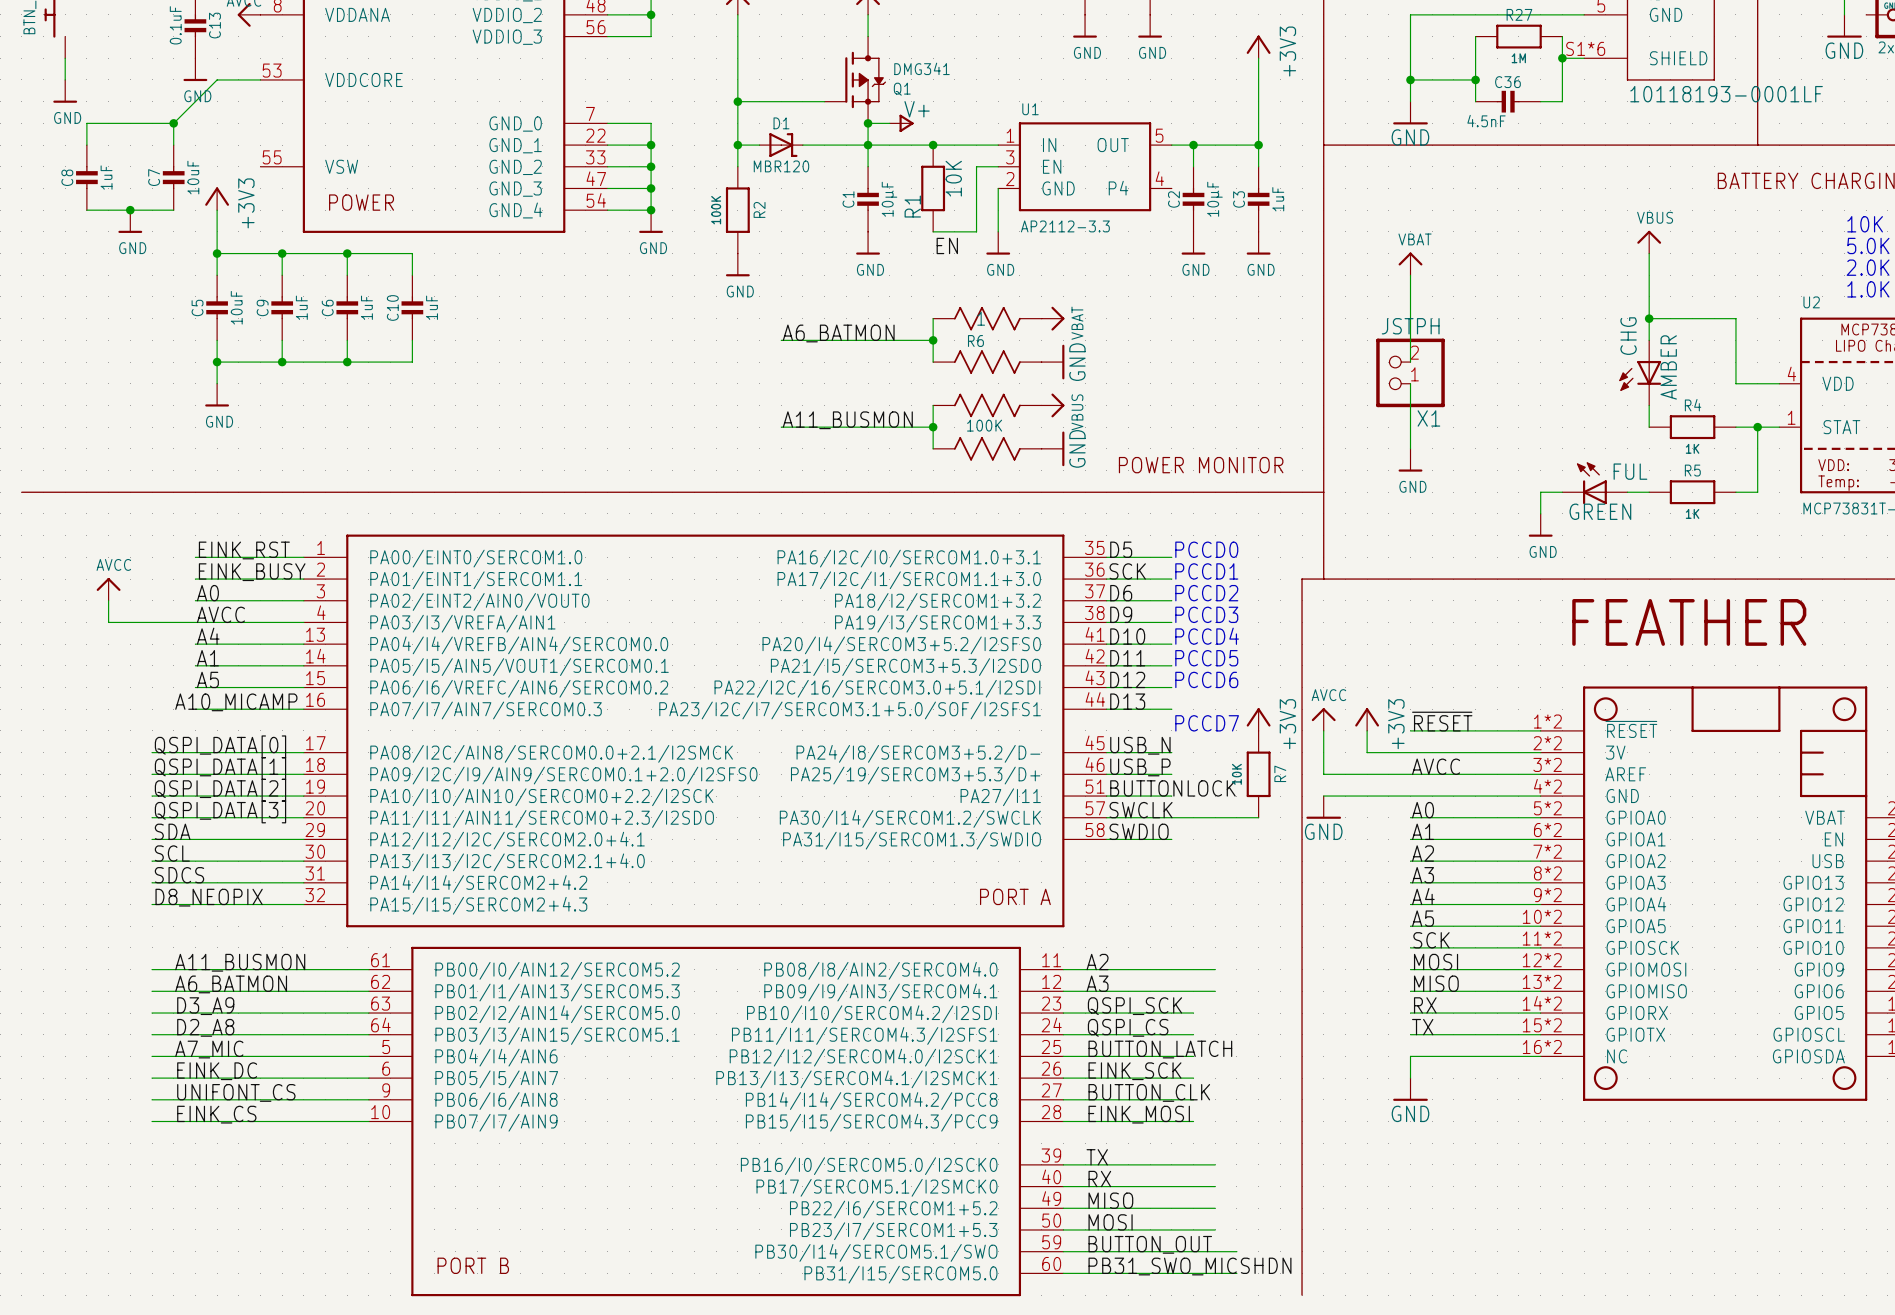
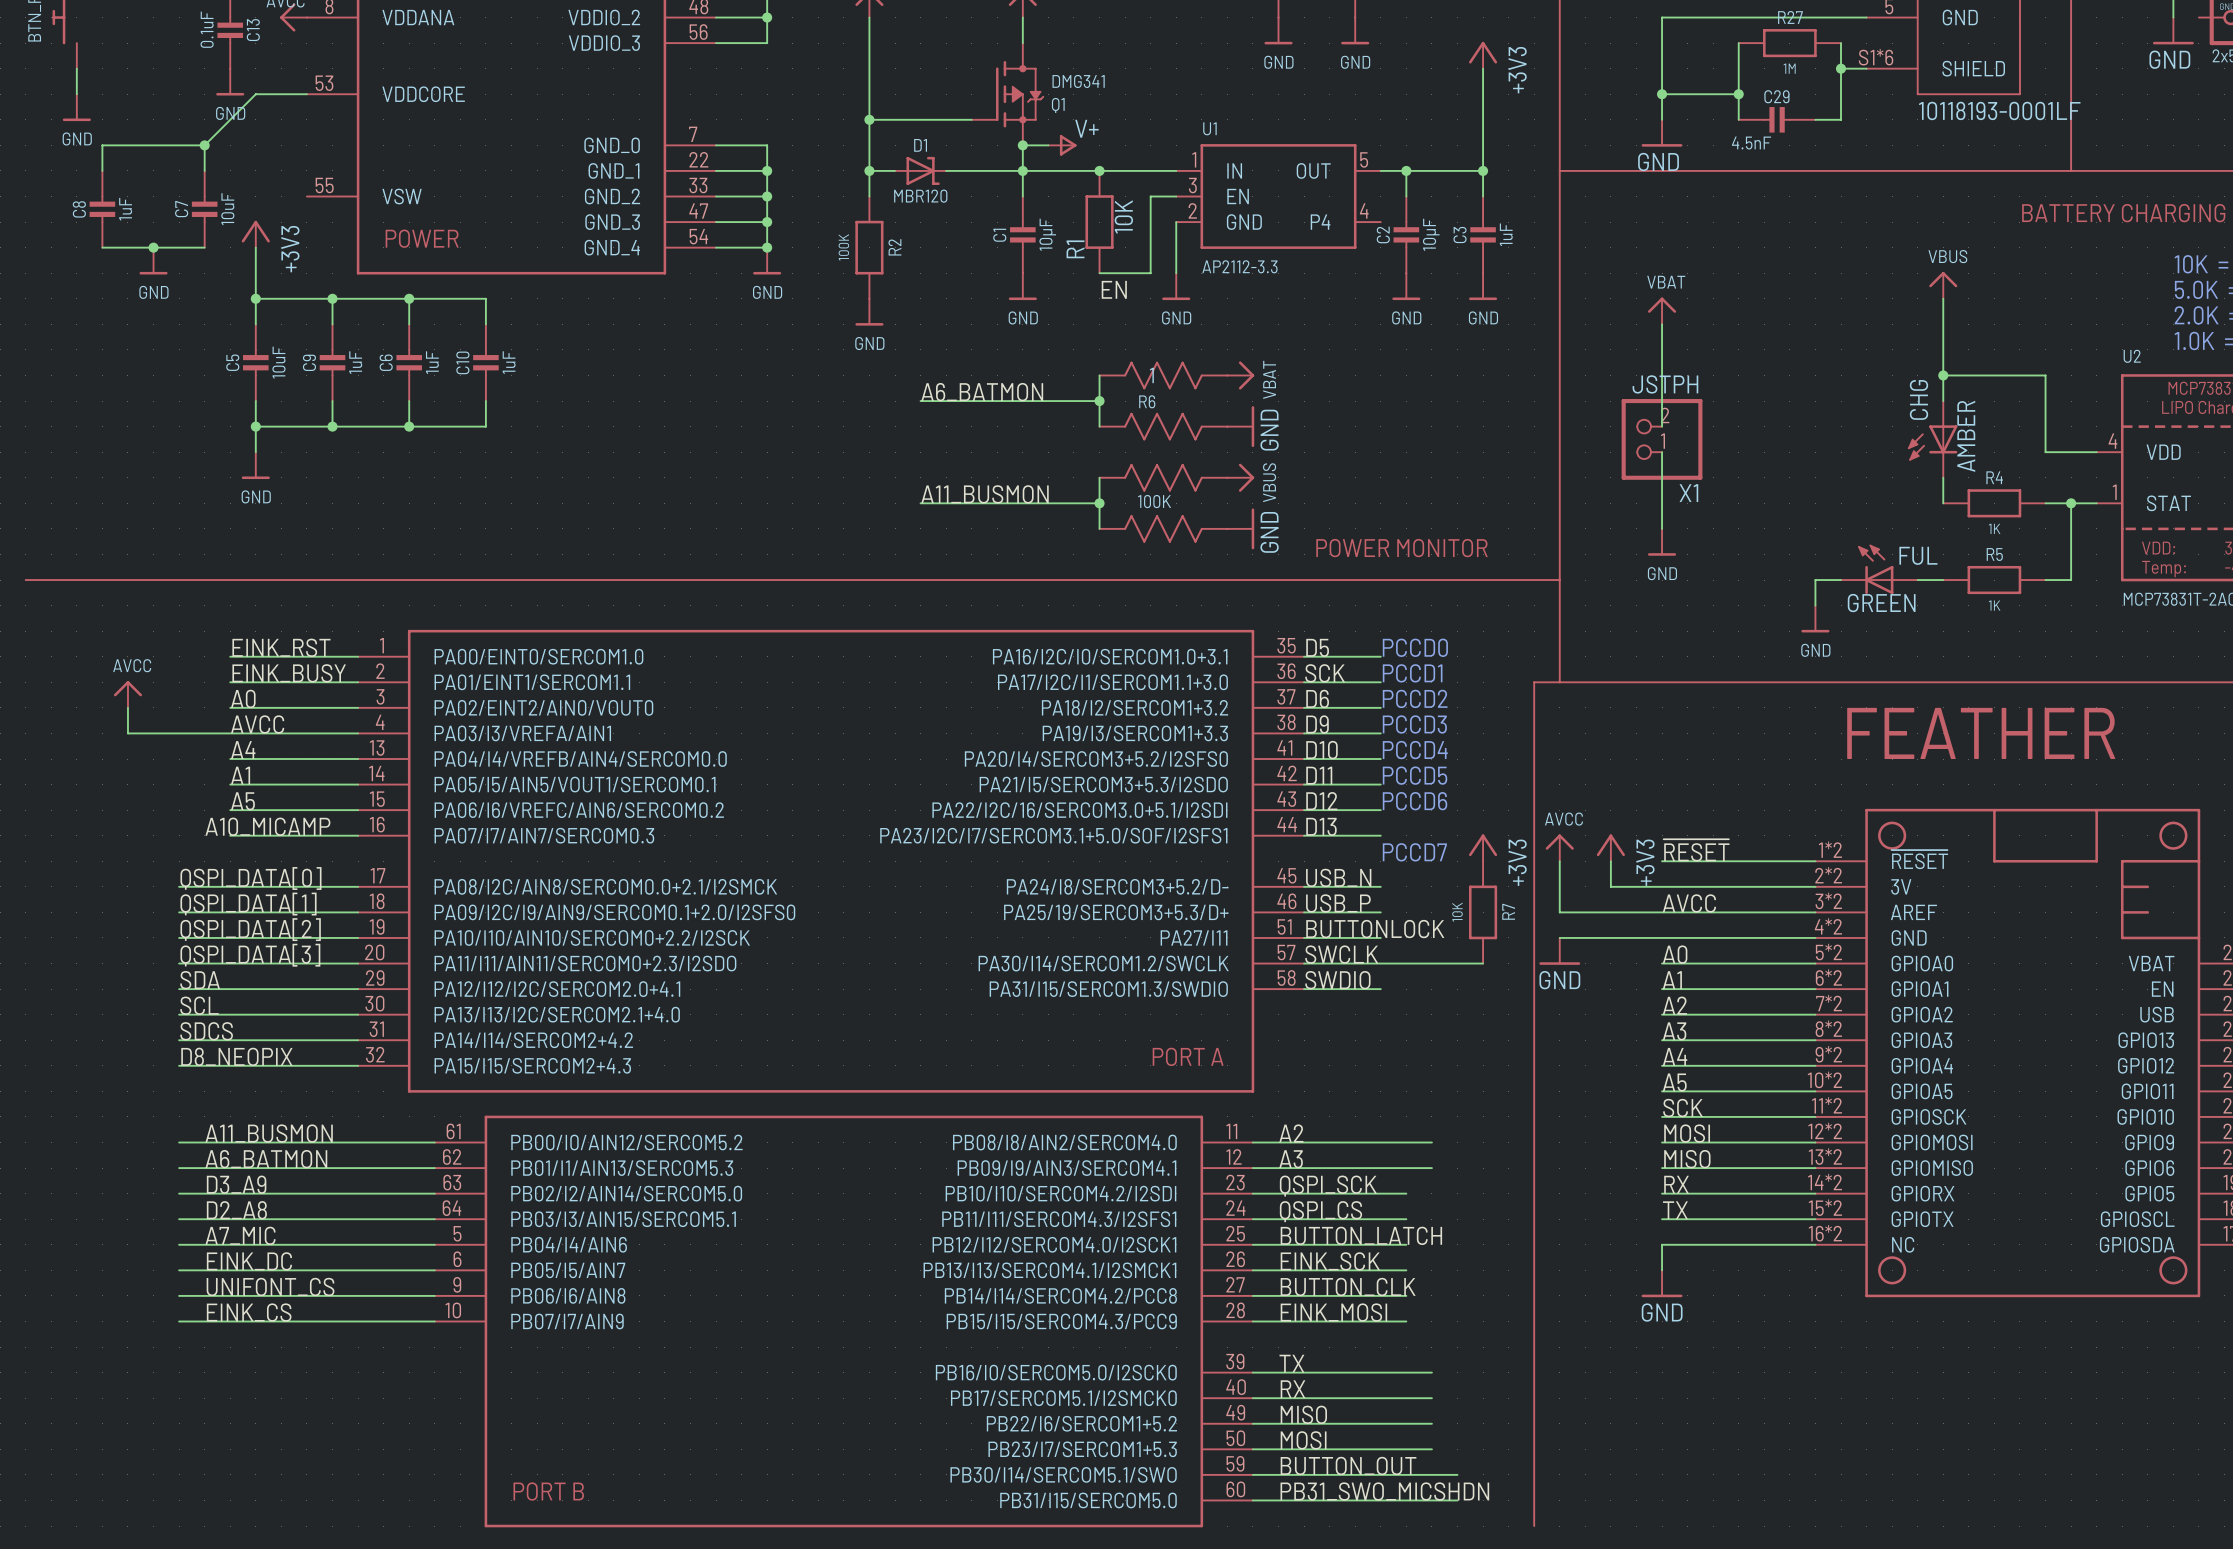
C36 name: C36 (1507, 82) -> C29 (1776, 96)

